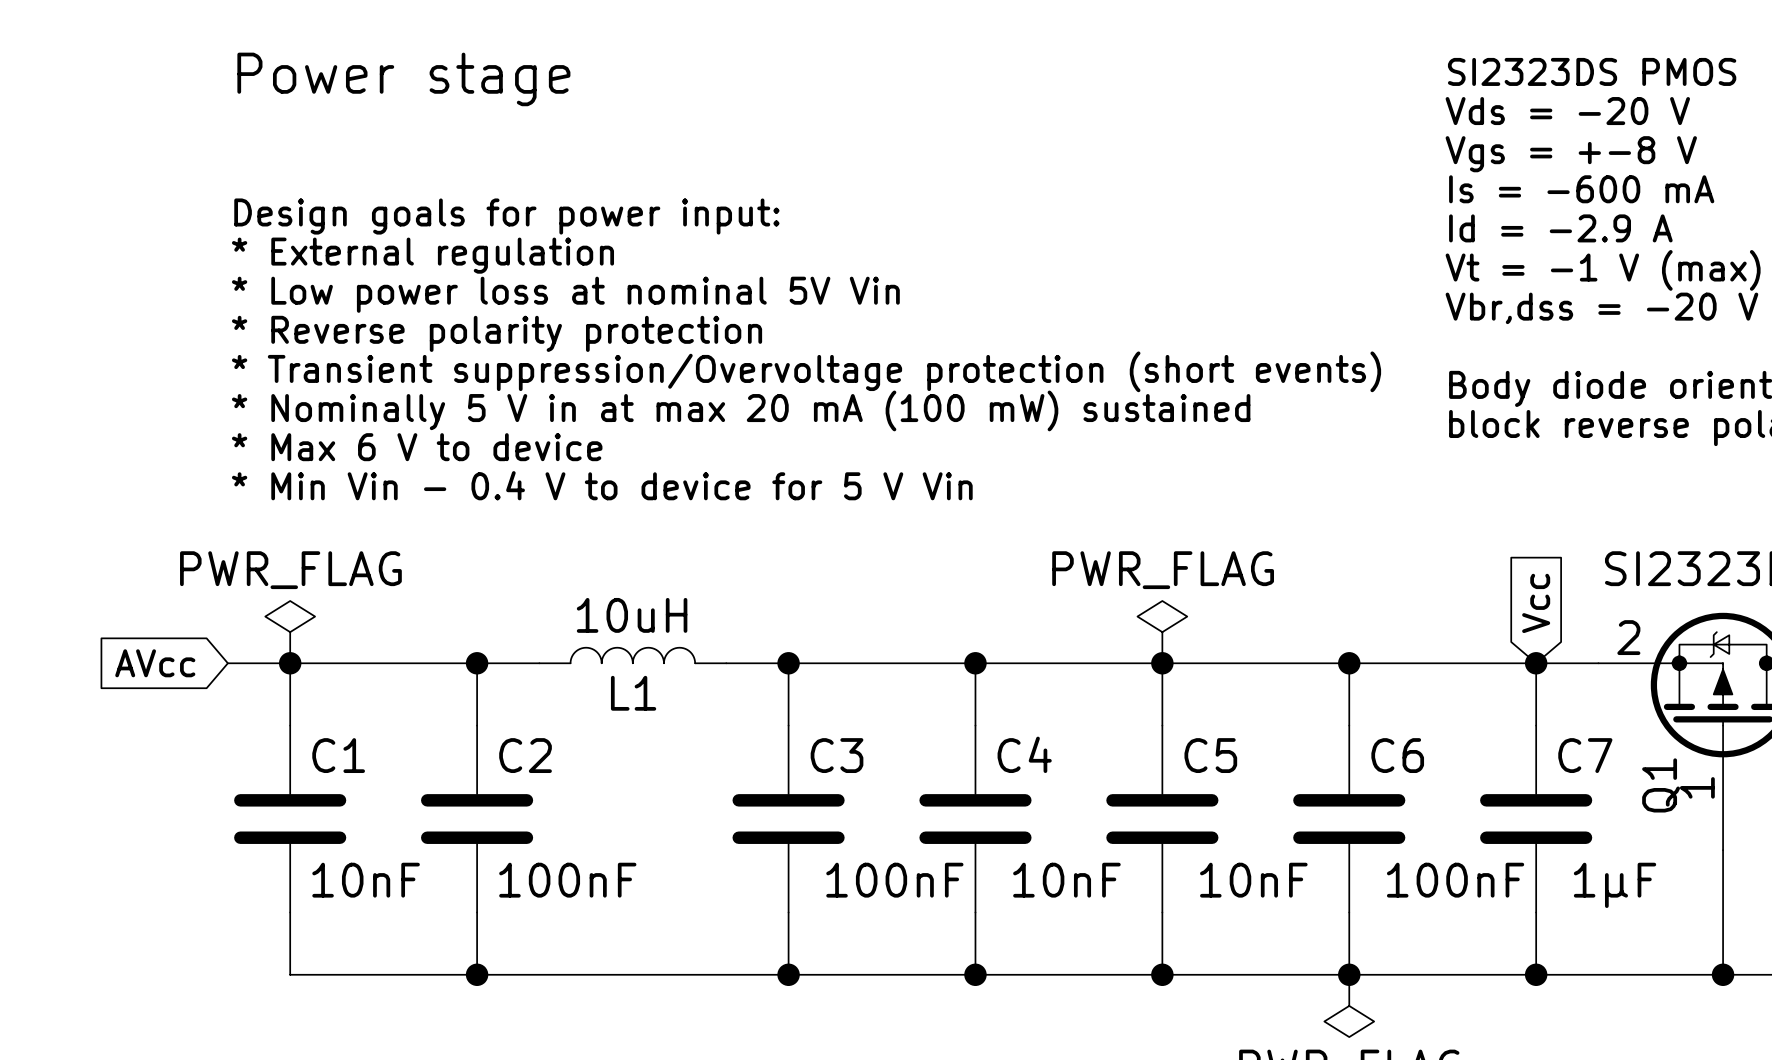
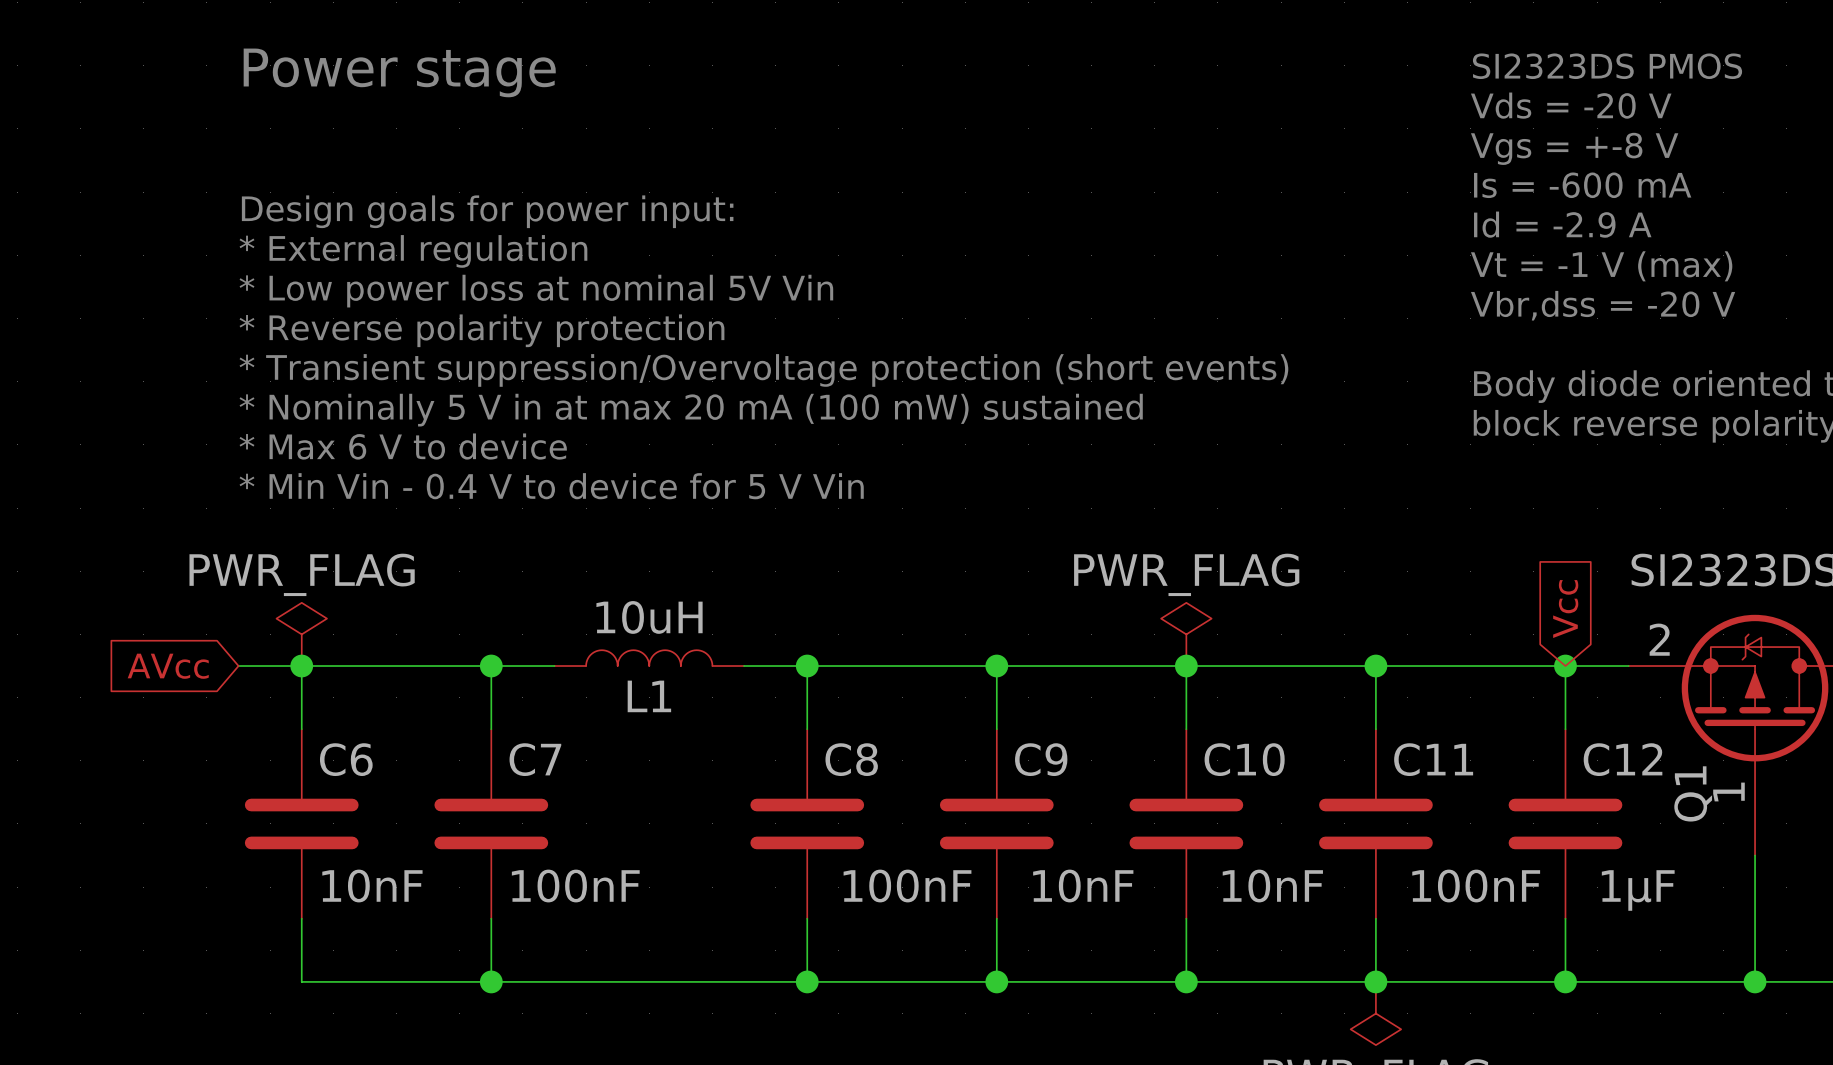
C4 name: C4 (1024, 754) -> C9 (1041, 759)
C1 name: C1 (338, 755) -> C6 (346, 759)
C2 name: C2 (525, 755) -> C7 (535, 759)
C3 name: C3 (837, 755) -> C8 (851, 759)
C5 name: C5 (1210, 755) -> C10 (1244, 759)
C6 name: C6 (1397, 755) -> C11 (1433, 759)
C7 name: C7 (1585, 755) -> C12 (1623, 759)

